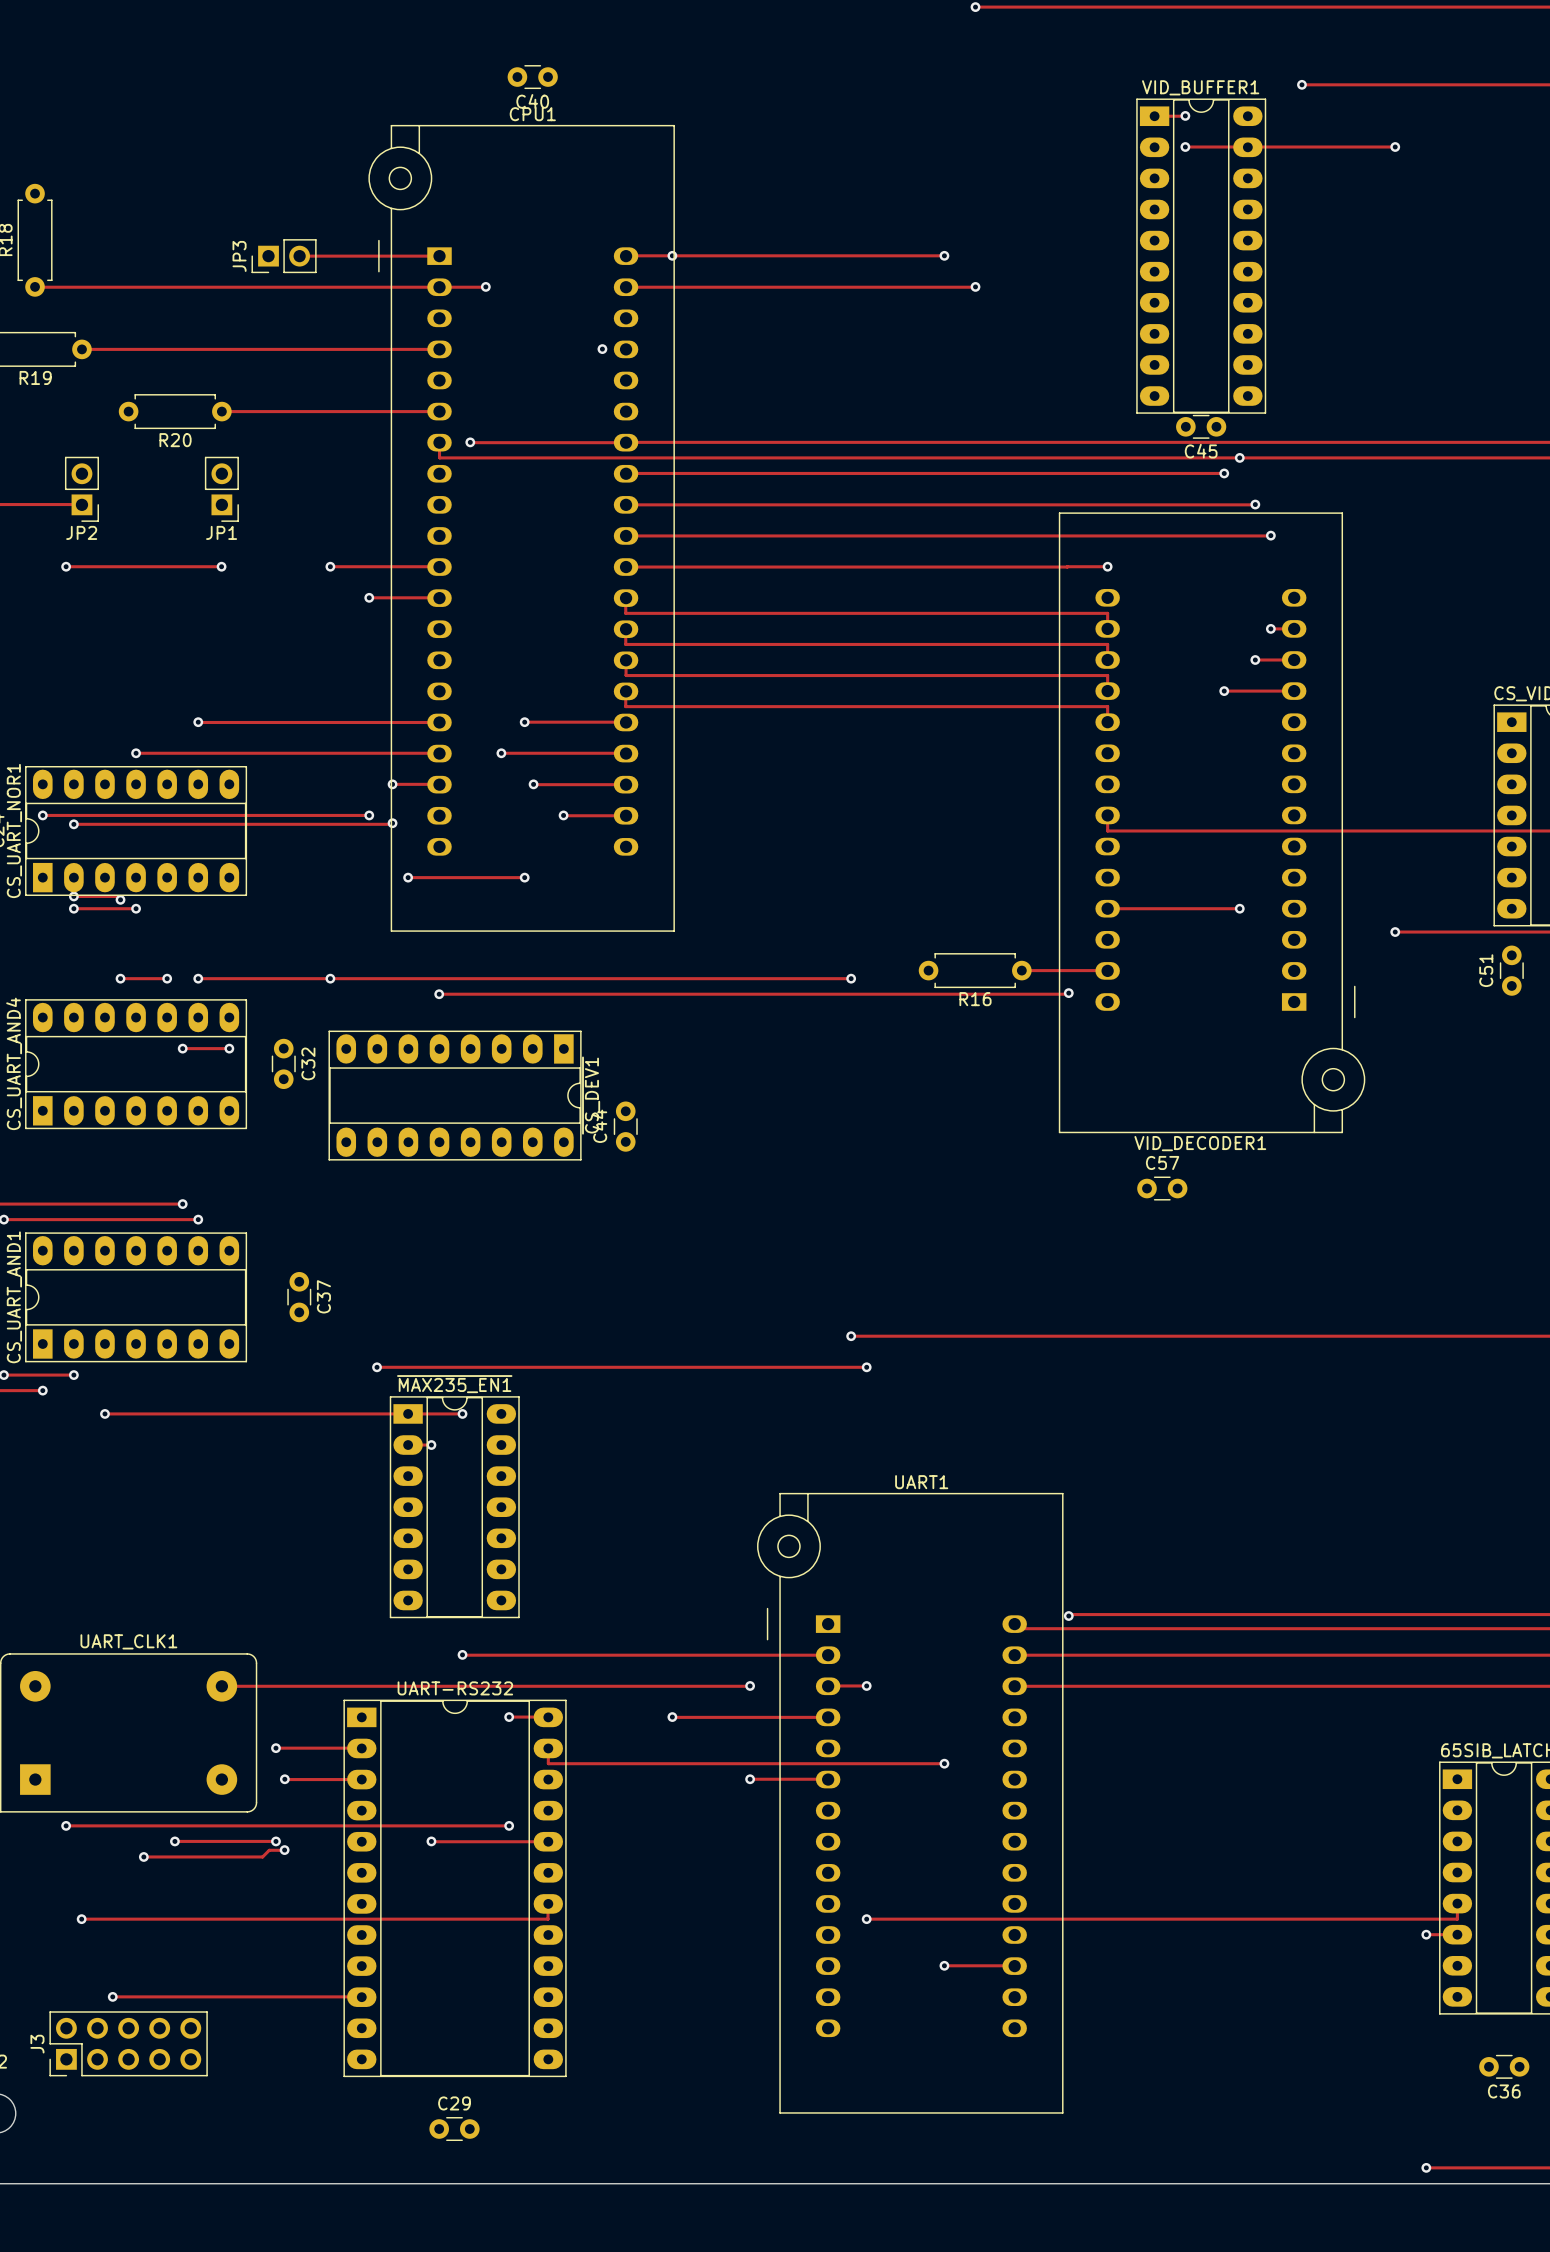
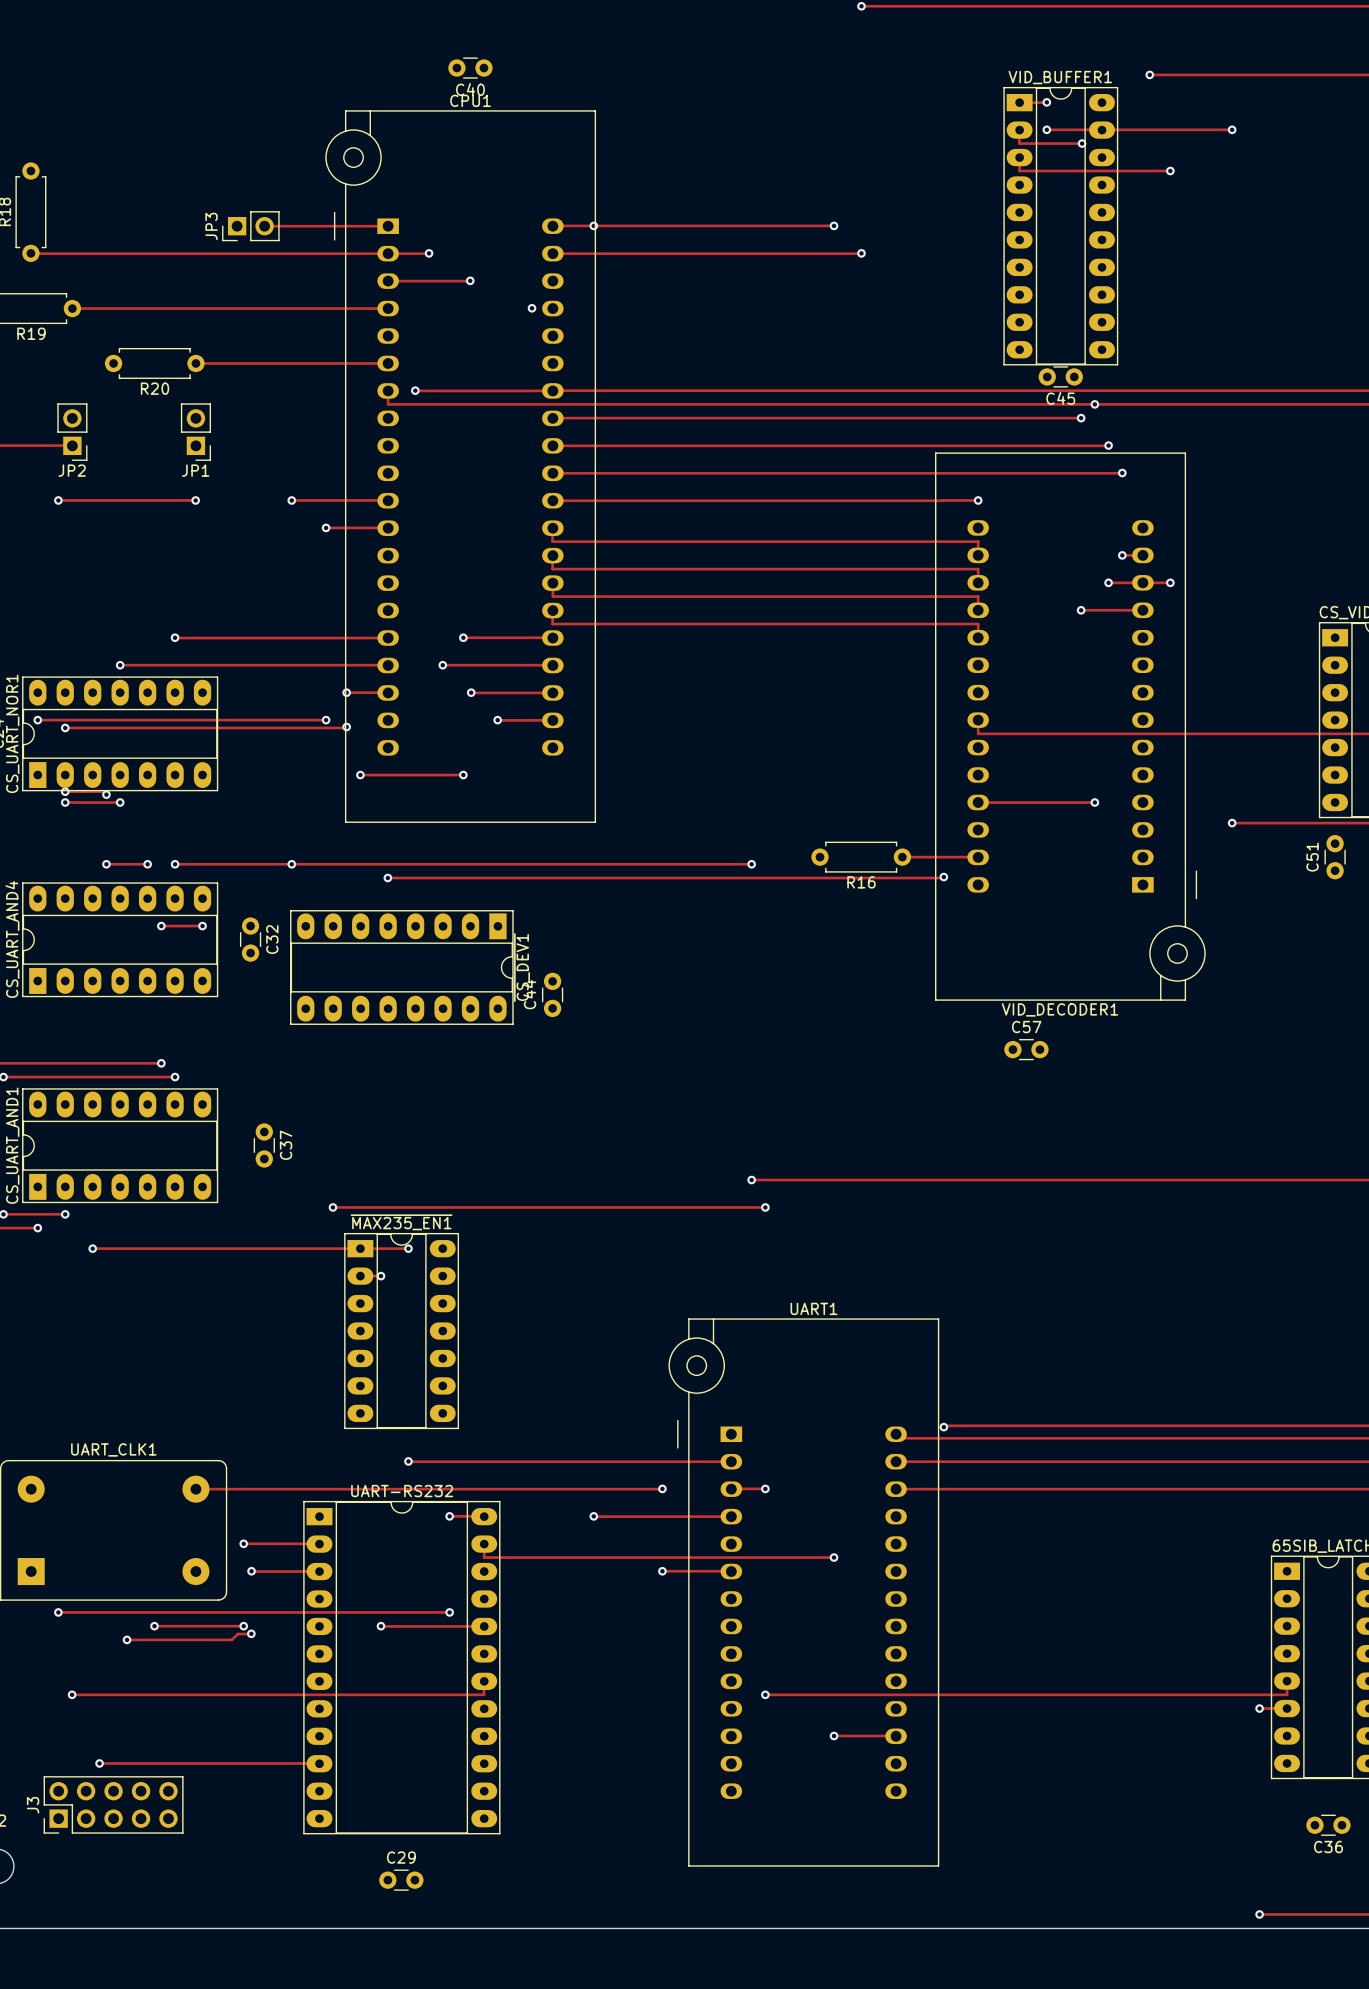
track: none -> (1019, 130) (1019, 143) (1082, 143)
via: none -> (1082, 143)
track: none -> (1019, 157) (1019, 171) (1170, 171)
via: none -> (1170, 171)
track: none -> (470, 280) (388, 281)
via: none -> (470, 280)
track: none -> (1142, 582) (1170, 582)
via: none -> (1170, 582)

